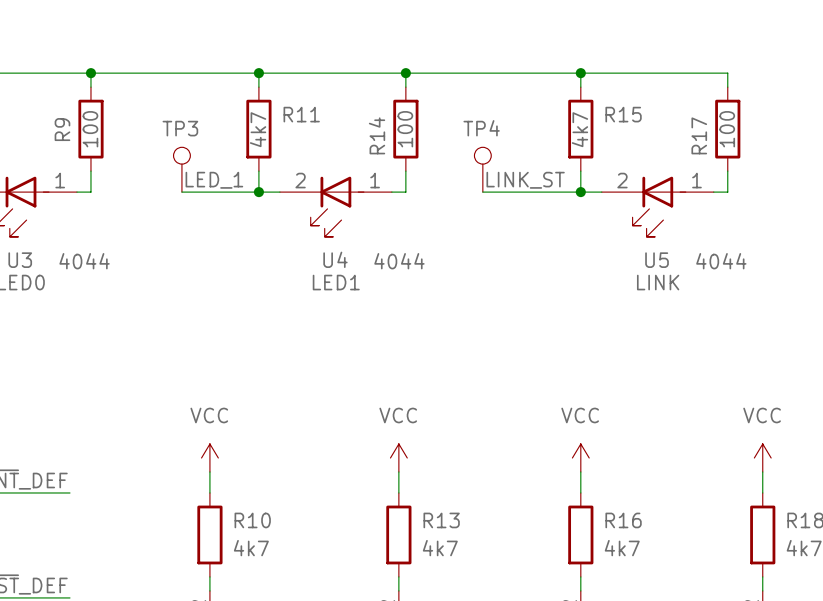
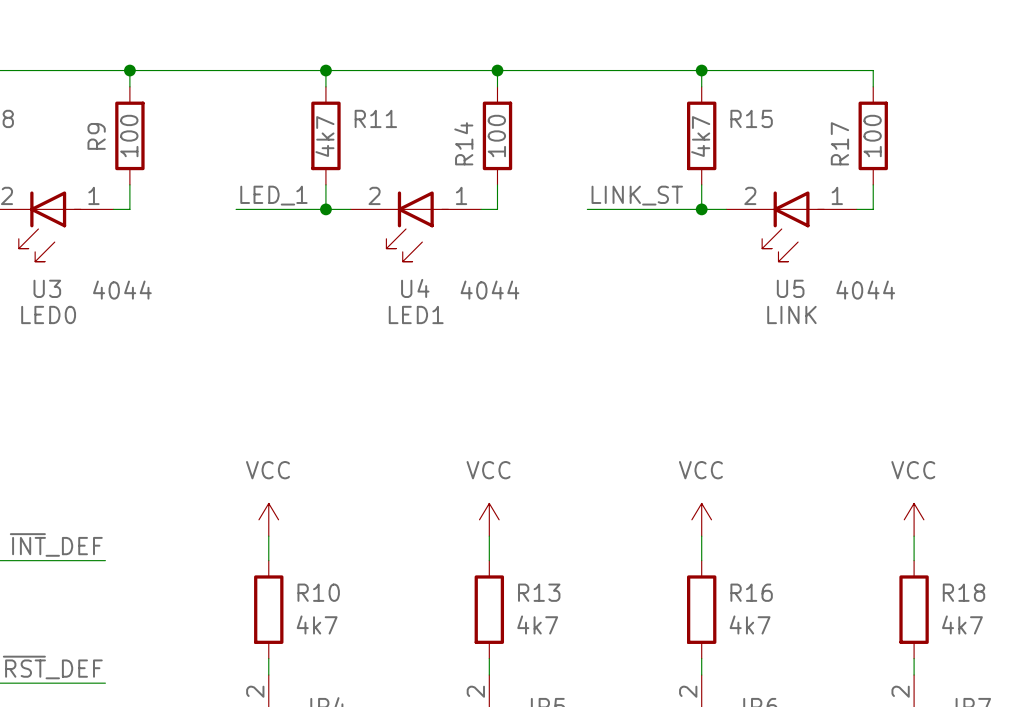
TP3: (181, 169) -> none
TP4: (482, 169) -> none

